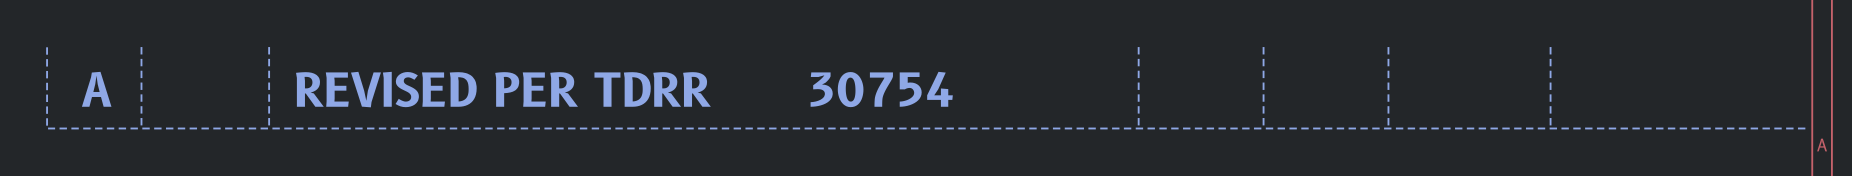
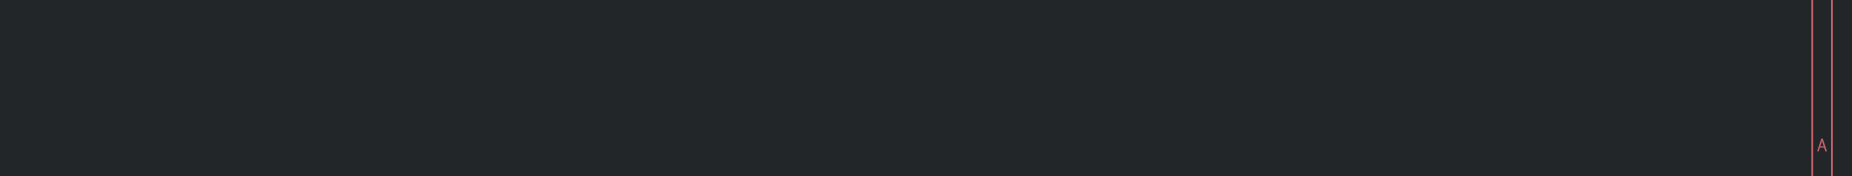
line: (47, 47) (47, 128) -> none
line: (141, 47) (141, 128) -> none
line: (269, 47) (269, 128) -> none
line: (1138, 47) (1138, 128) -> none
line: (1263, 47) (1263, 128) -> none
line: (1388, 47) (1388, 128) -> none
line: (1550, 47) (1550, 128) -> none
text: A (96, 89) -> none
text: REVISED PER TDRR 30754 (624, 89) -> none
line: (48, 128) (1805, 128) -> none

